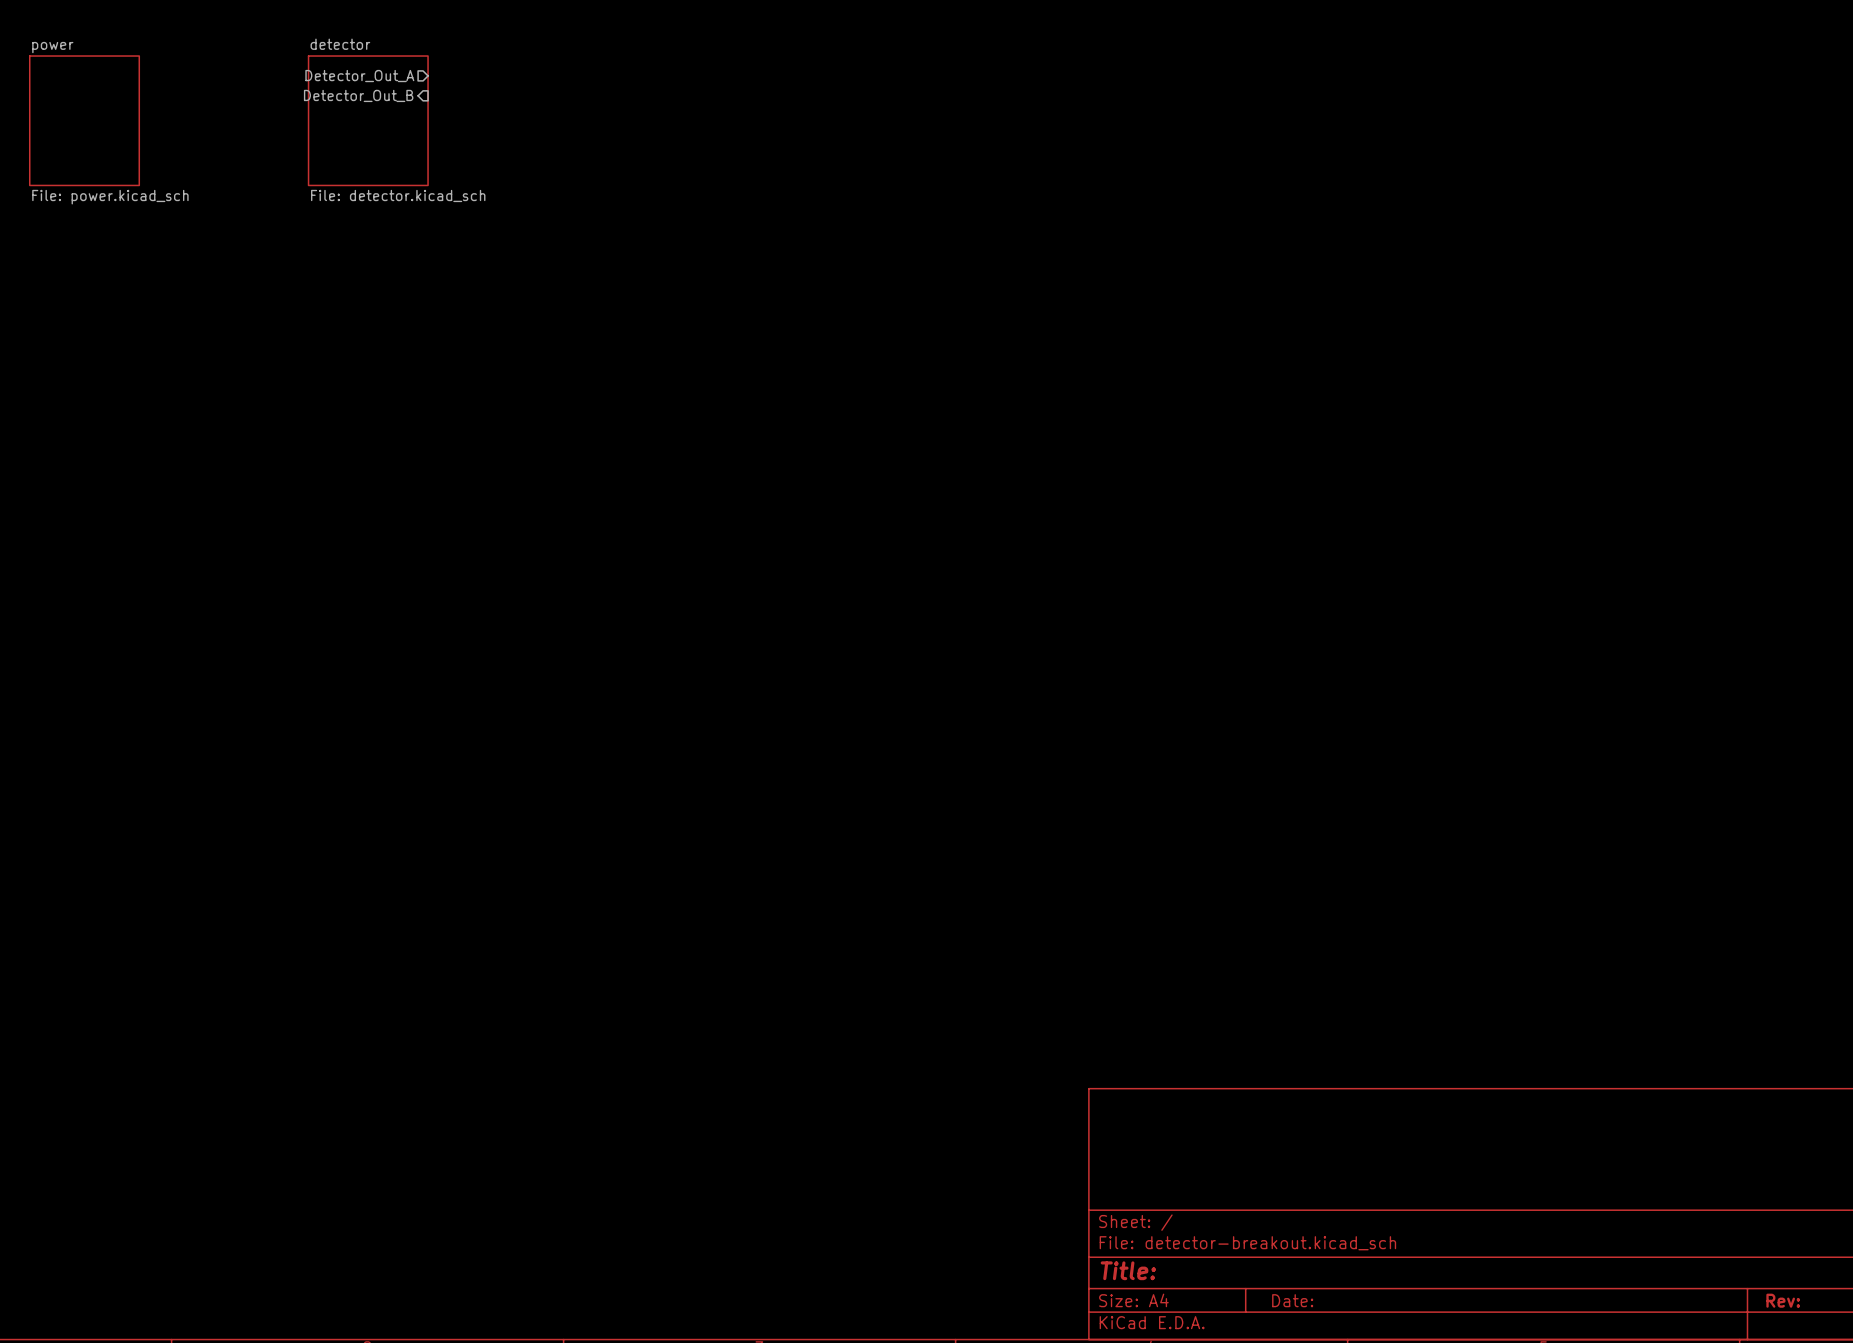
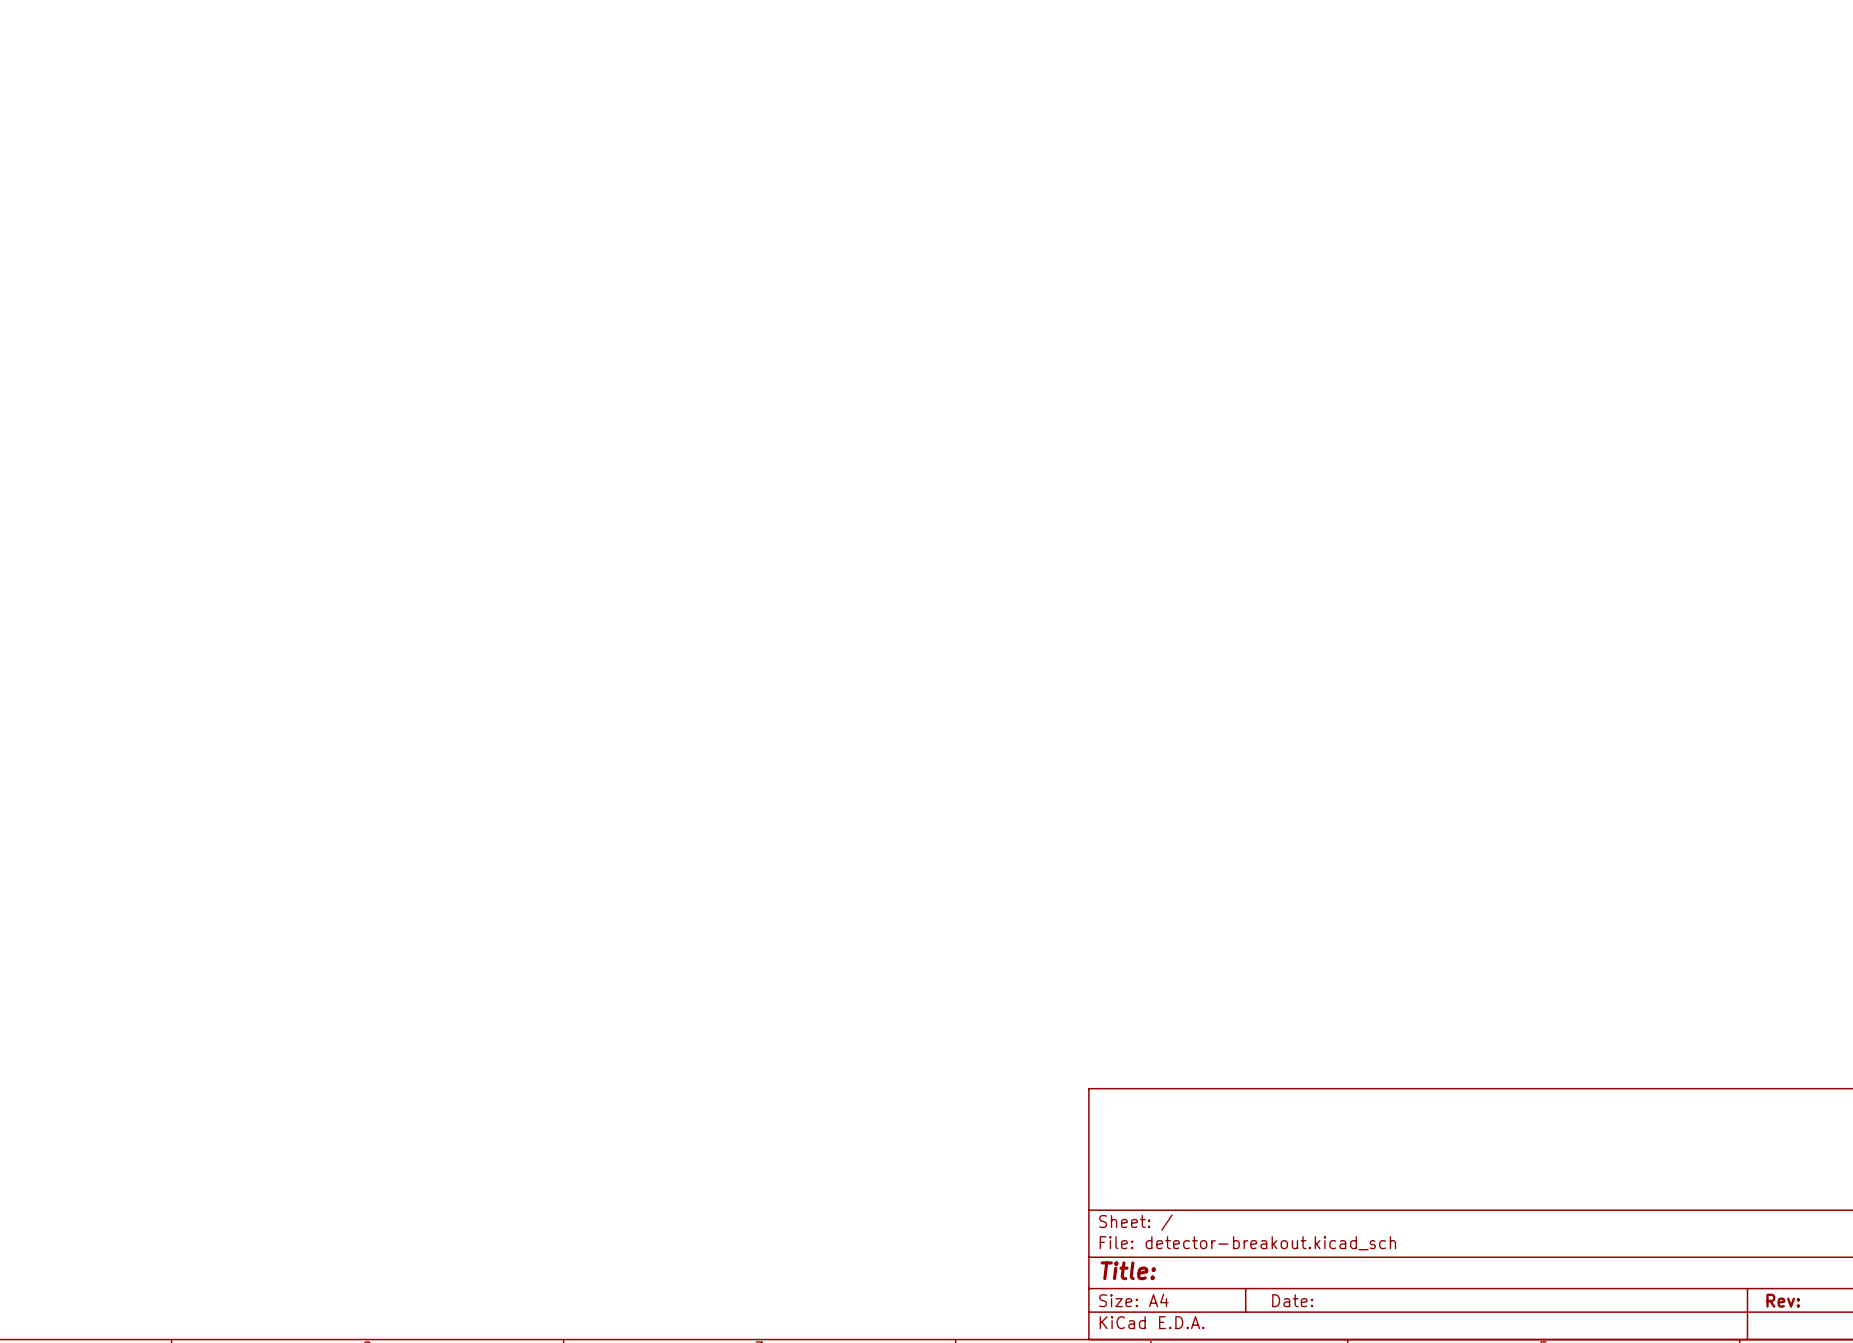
sheet pin: Detector_Out_A (359, 76) -> none
sheet pin: Detector_Out_B (358, 95) -> none
sheet power: File: power.kicad_sch (84, 120) -> none
sheet detector: File: detector.kicad_sch (368, 120) -> none

